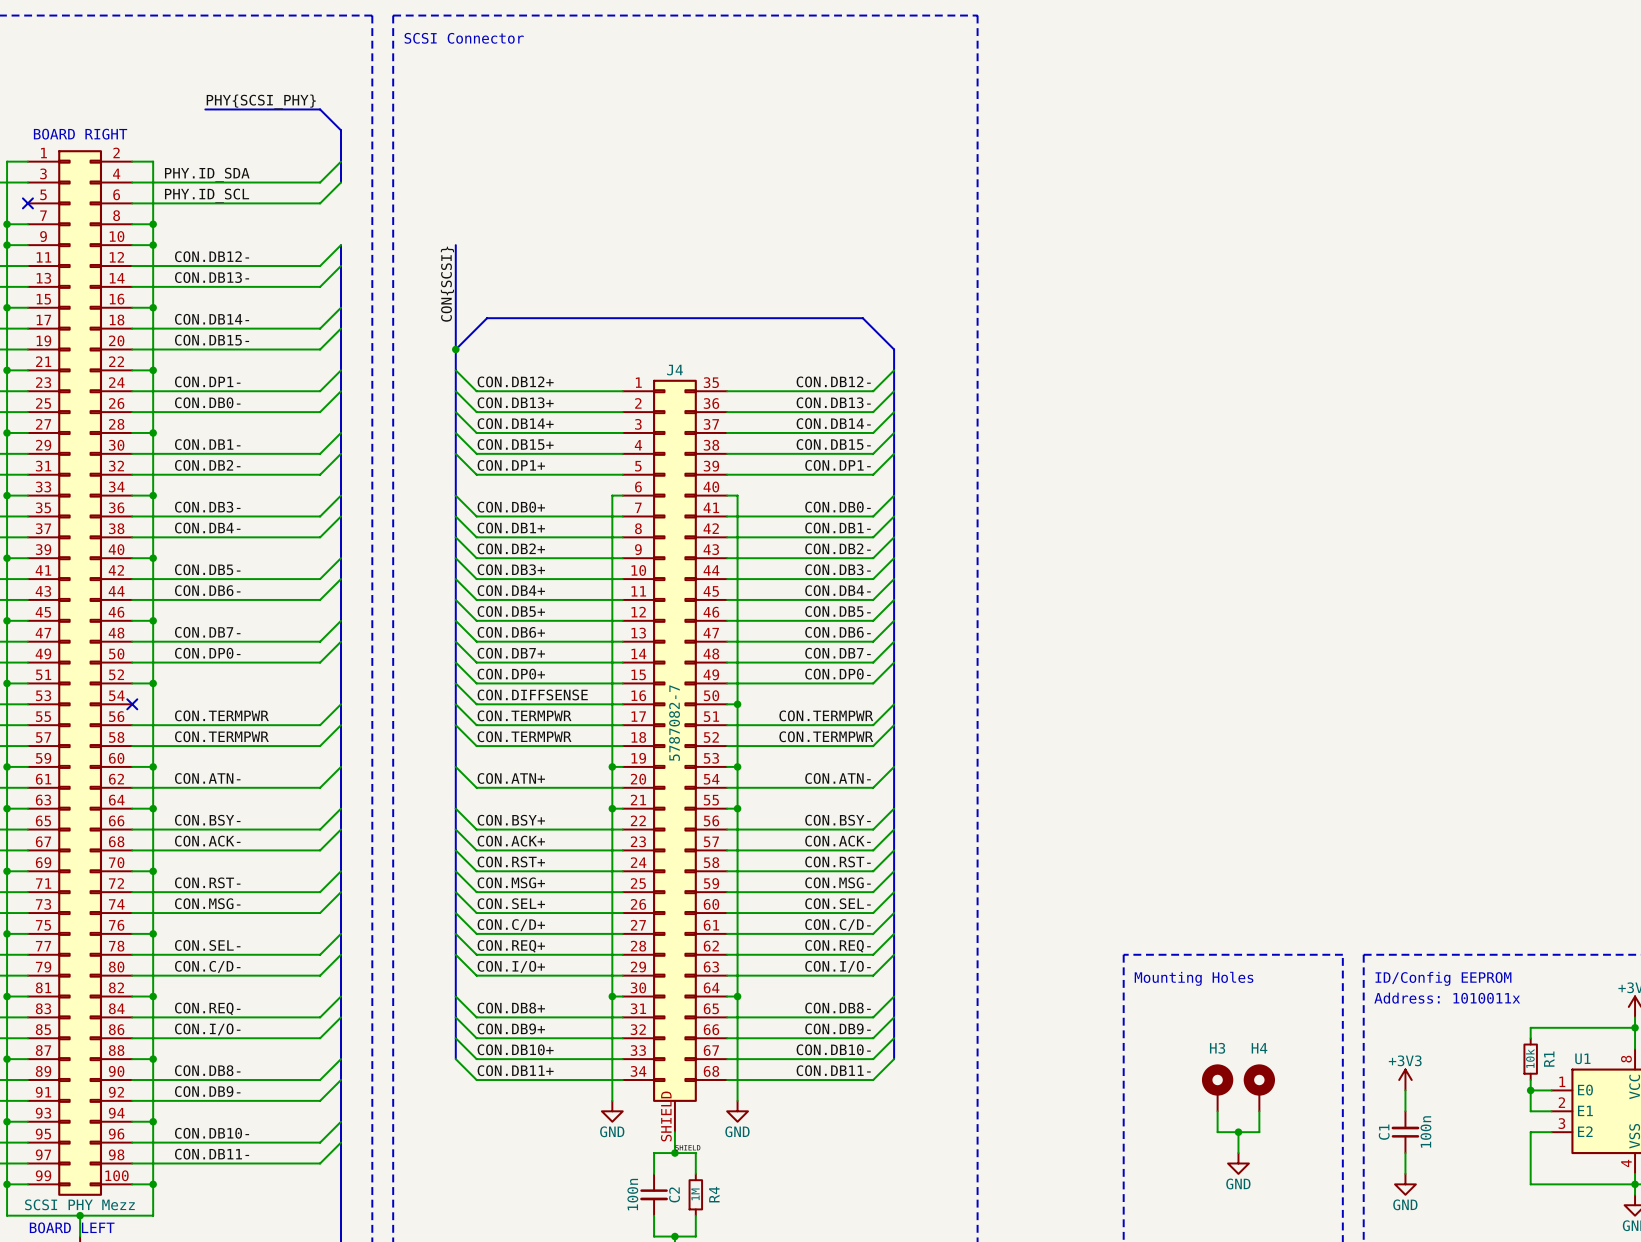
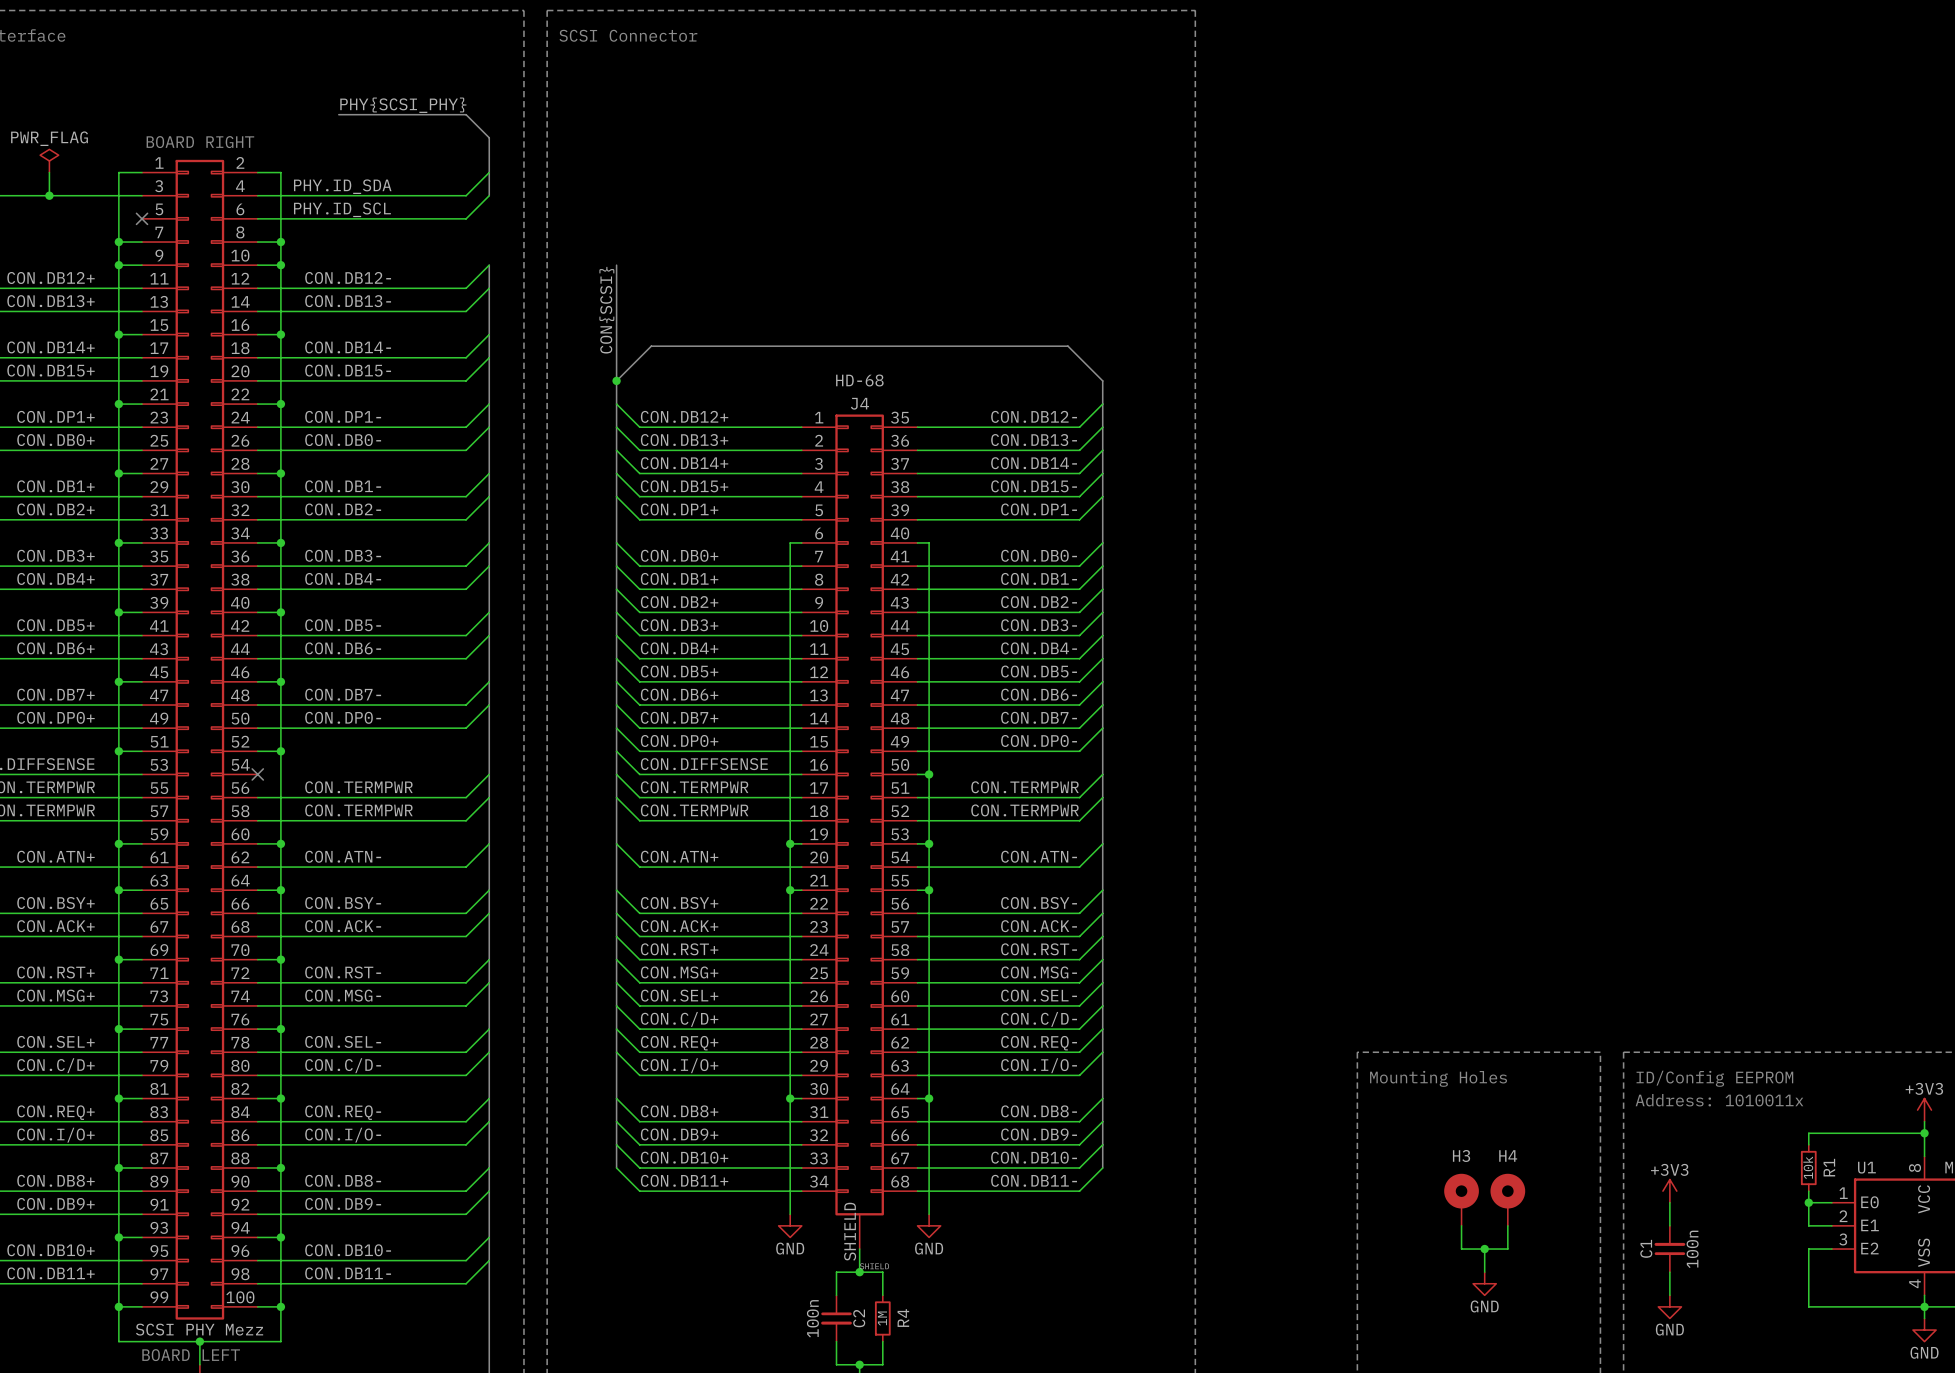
J4 value: 5787082-7 (674, 723) -> HD-68 (859, 380)

